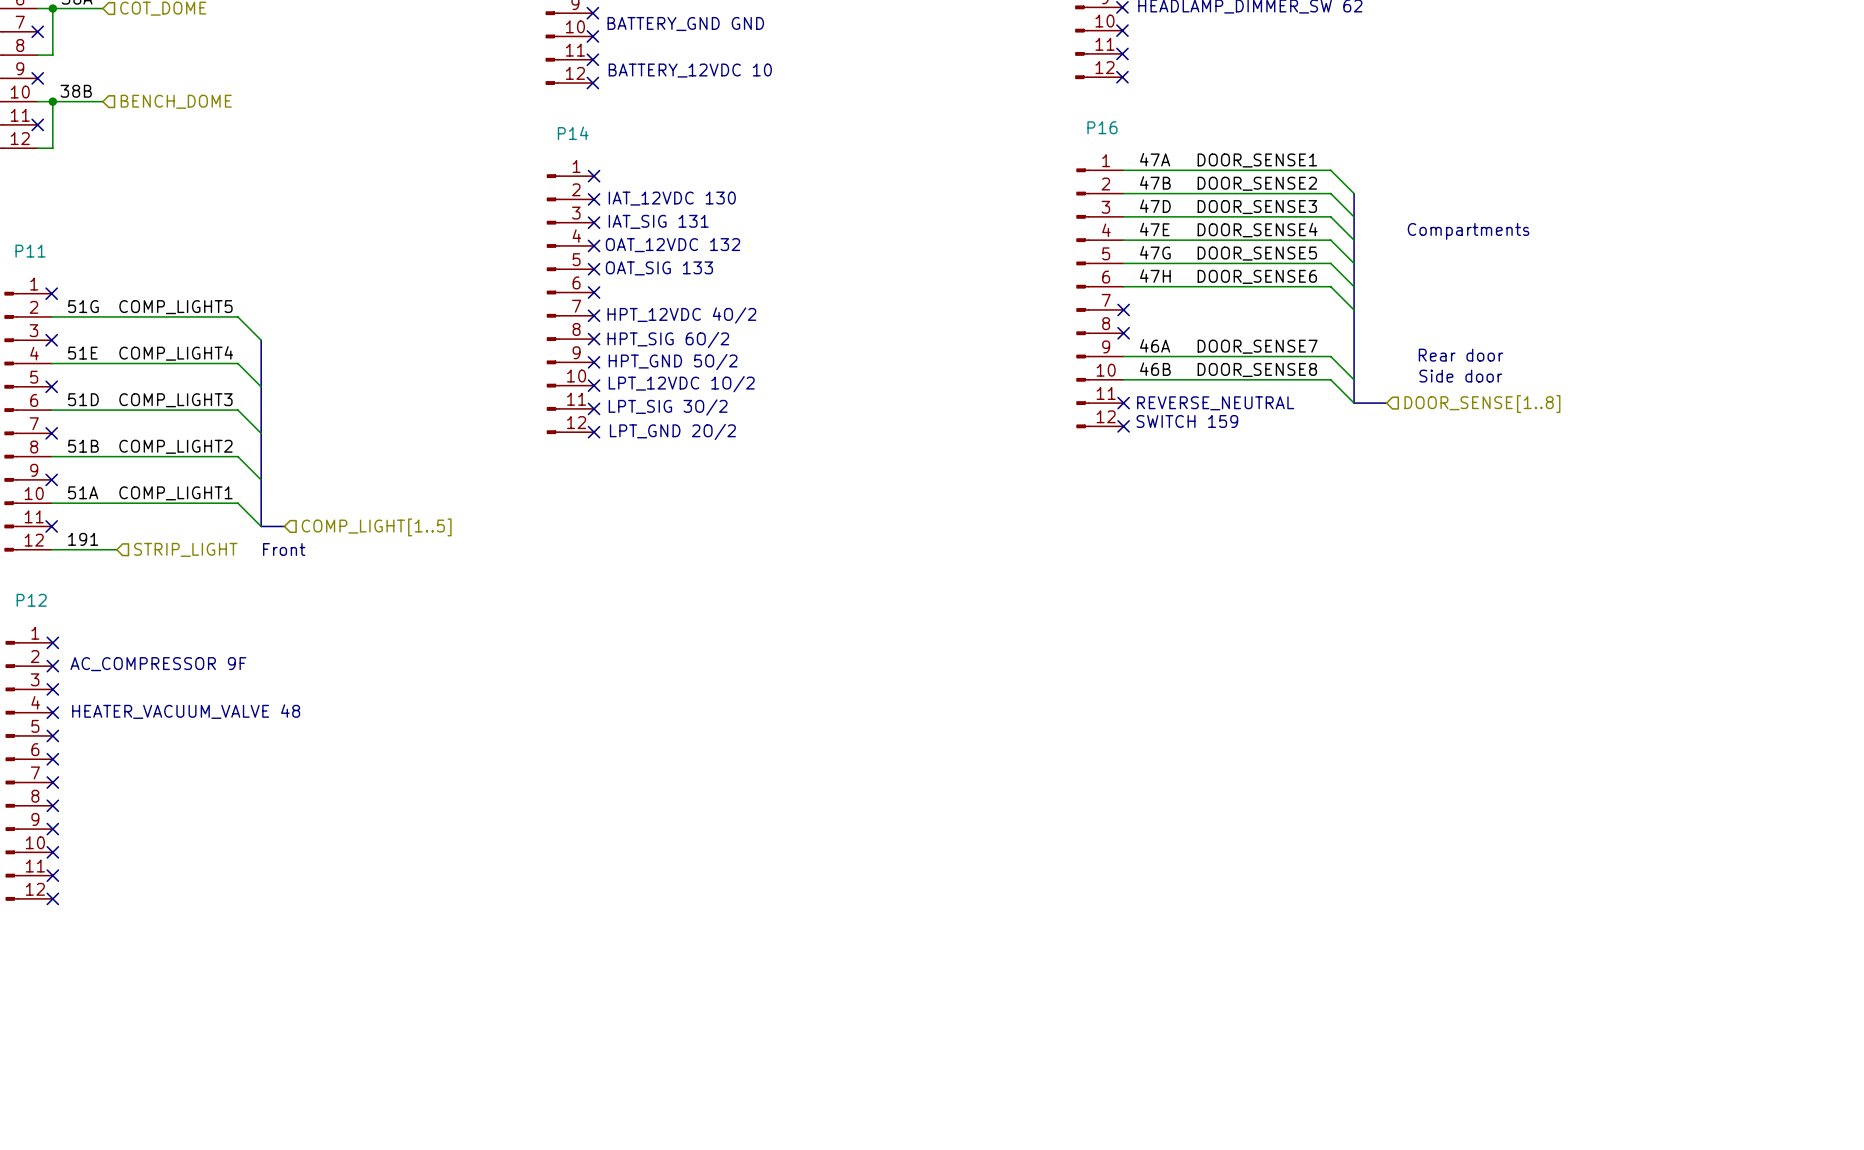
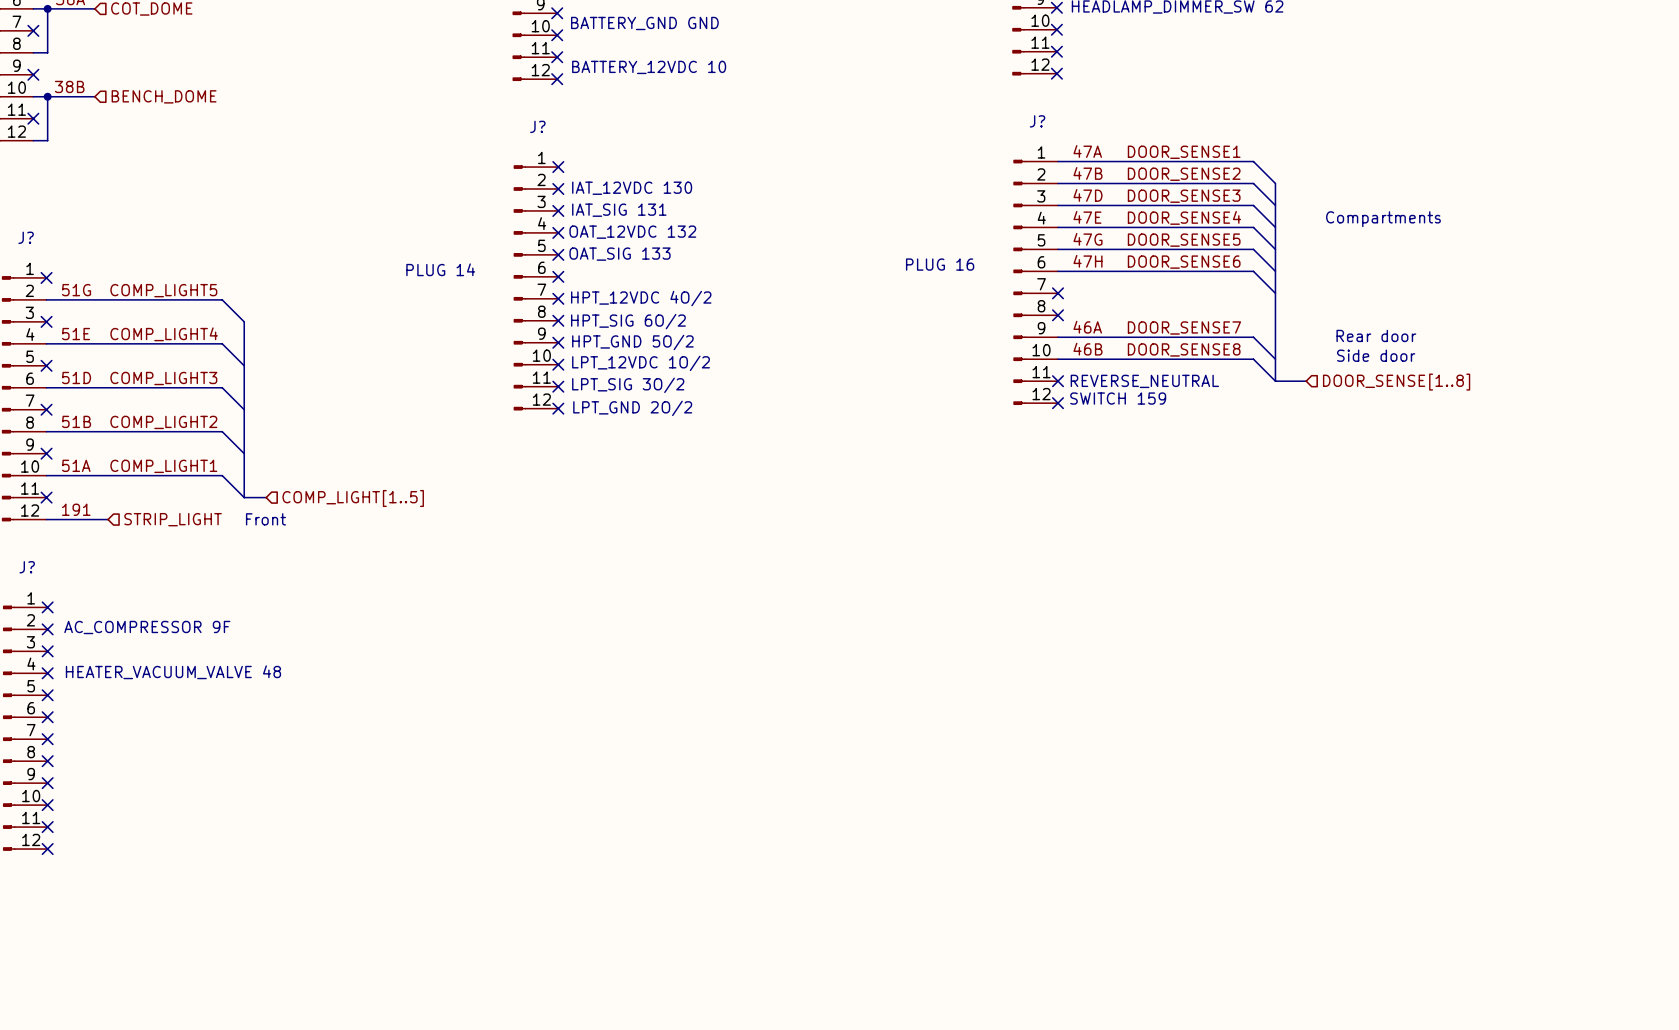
P16 name: P16 (1102, 127) -> J? (1037, 121)
P14 name: P14 (573, 133) -> J? (537, 126)
P11 name: P11 (30, 251) -> J? (26, 237)
text: none -> PLUG 16 (940, 264)
text: none -> PLUG 14 (440, 269)
P12 name: P12 (31, 600) -> J? (27, 567)

